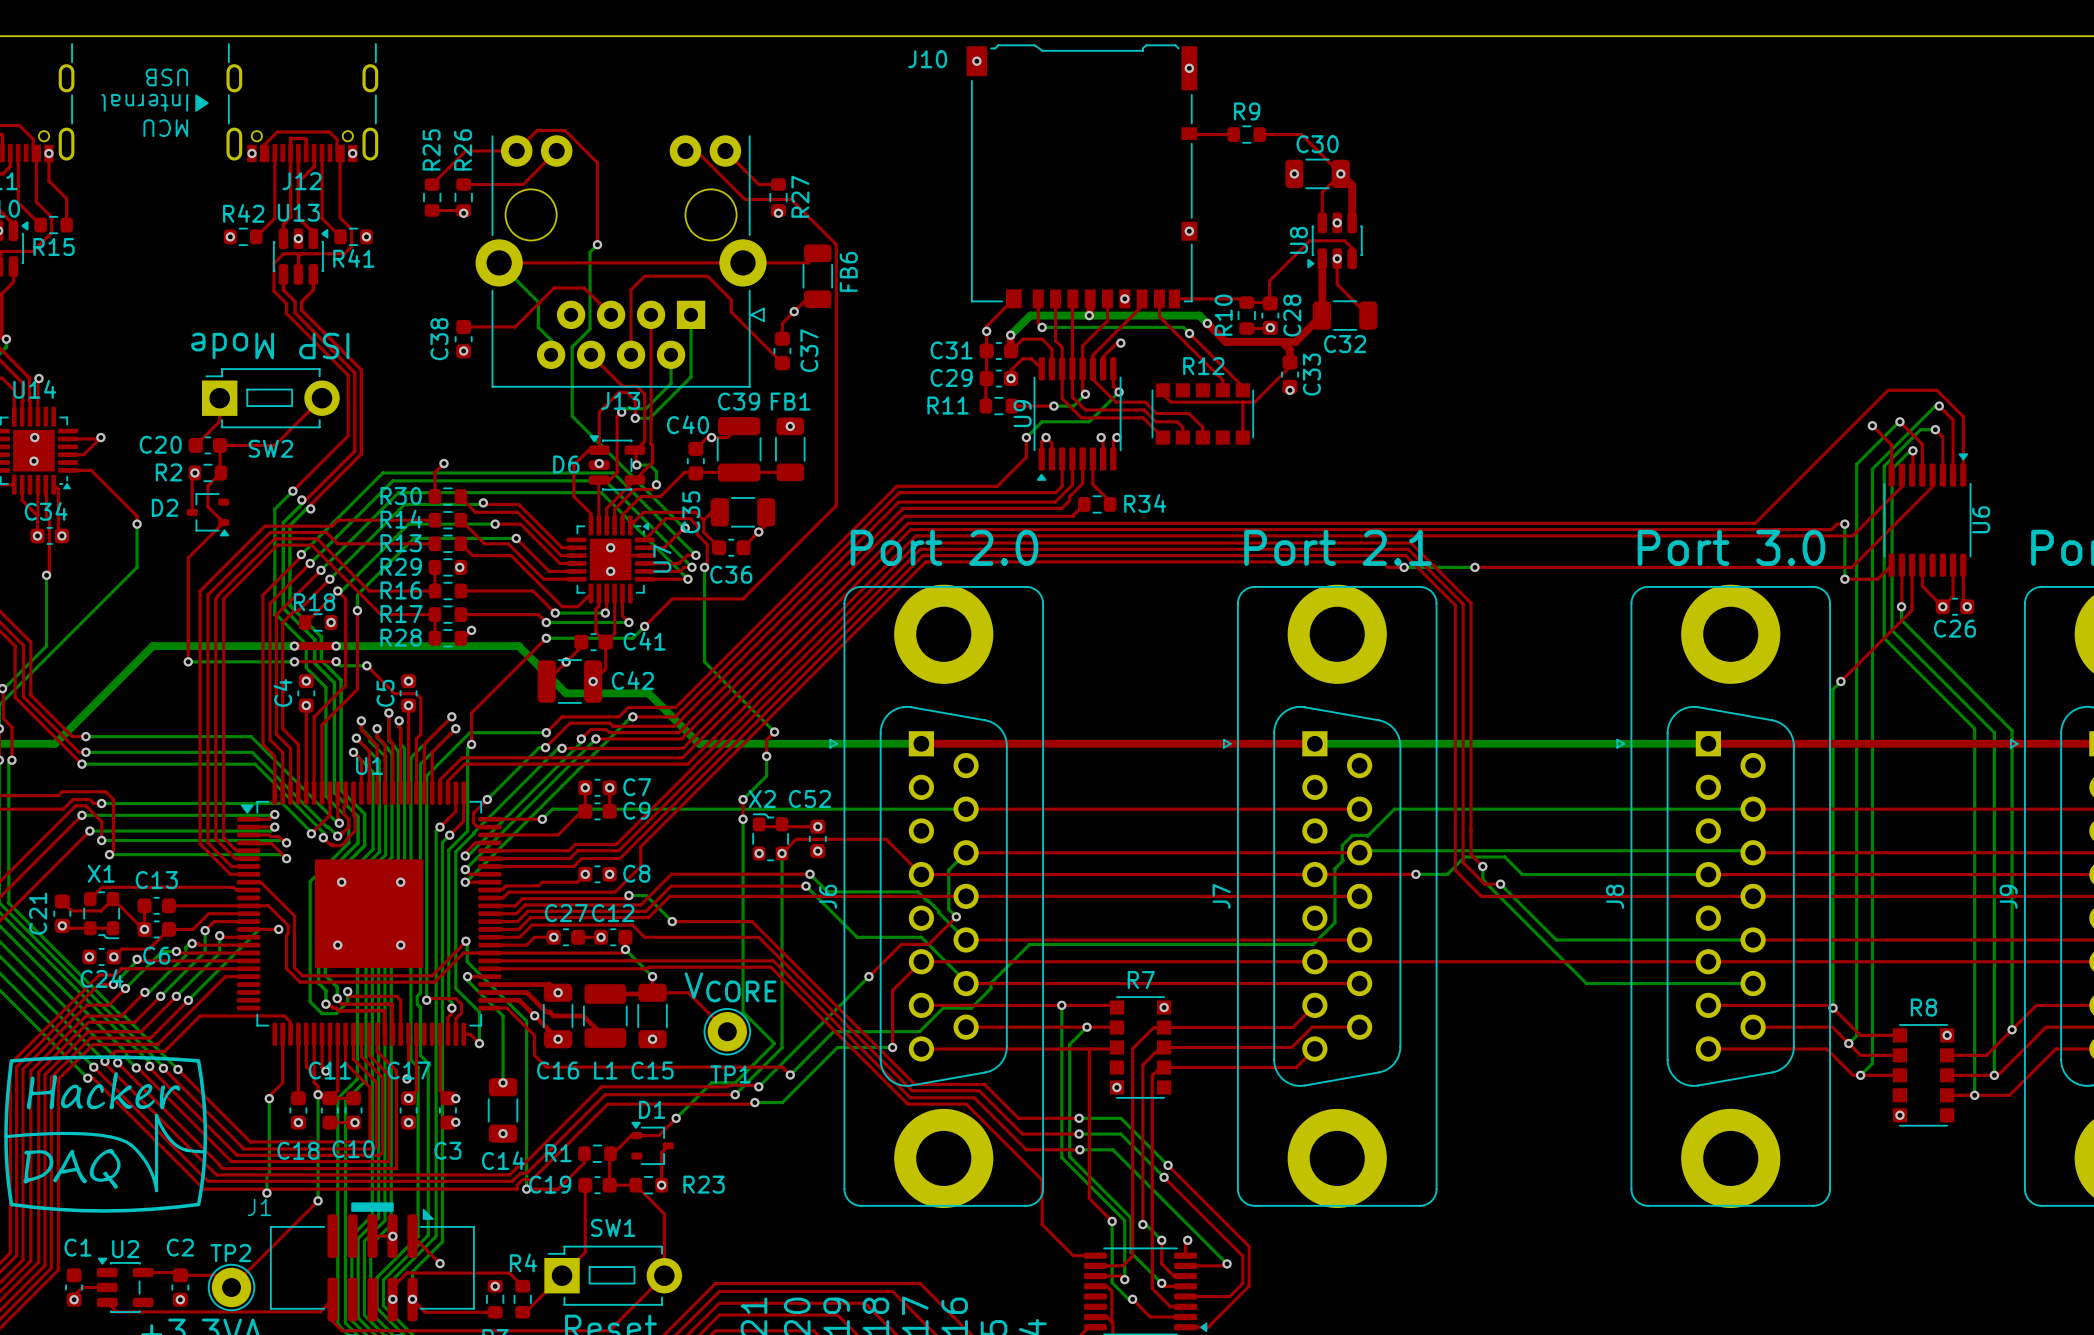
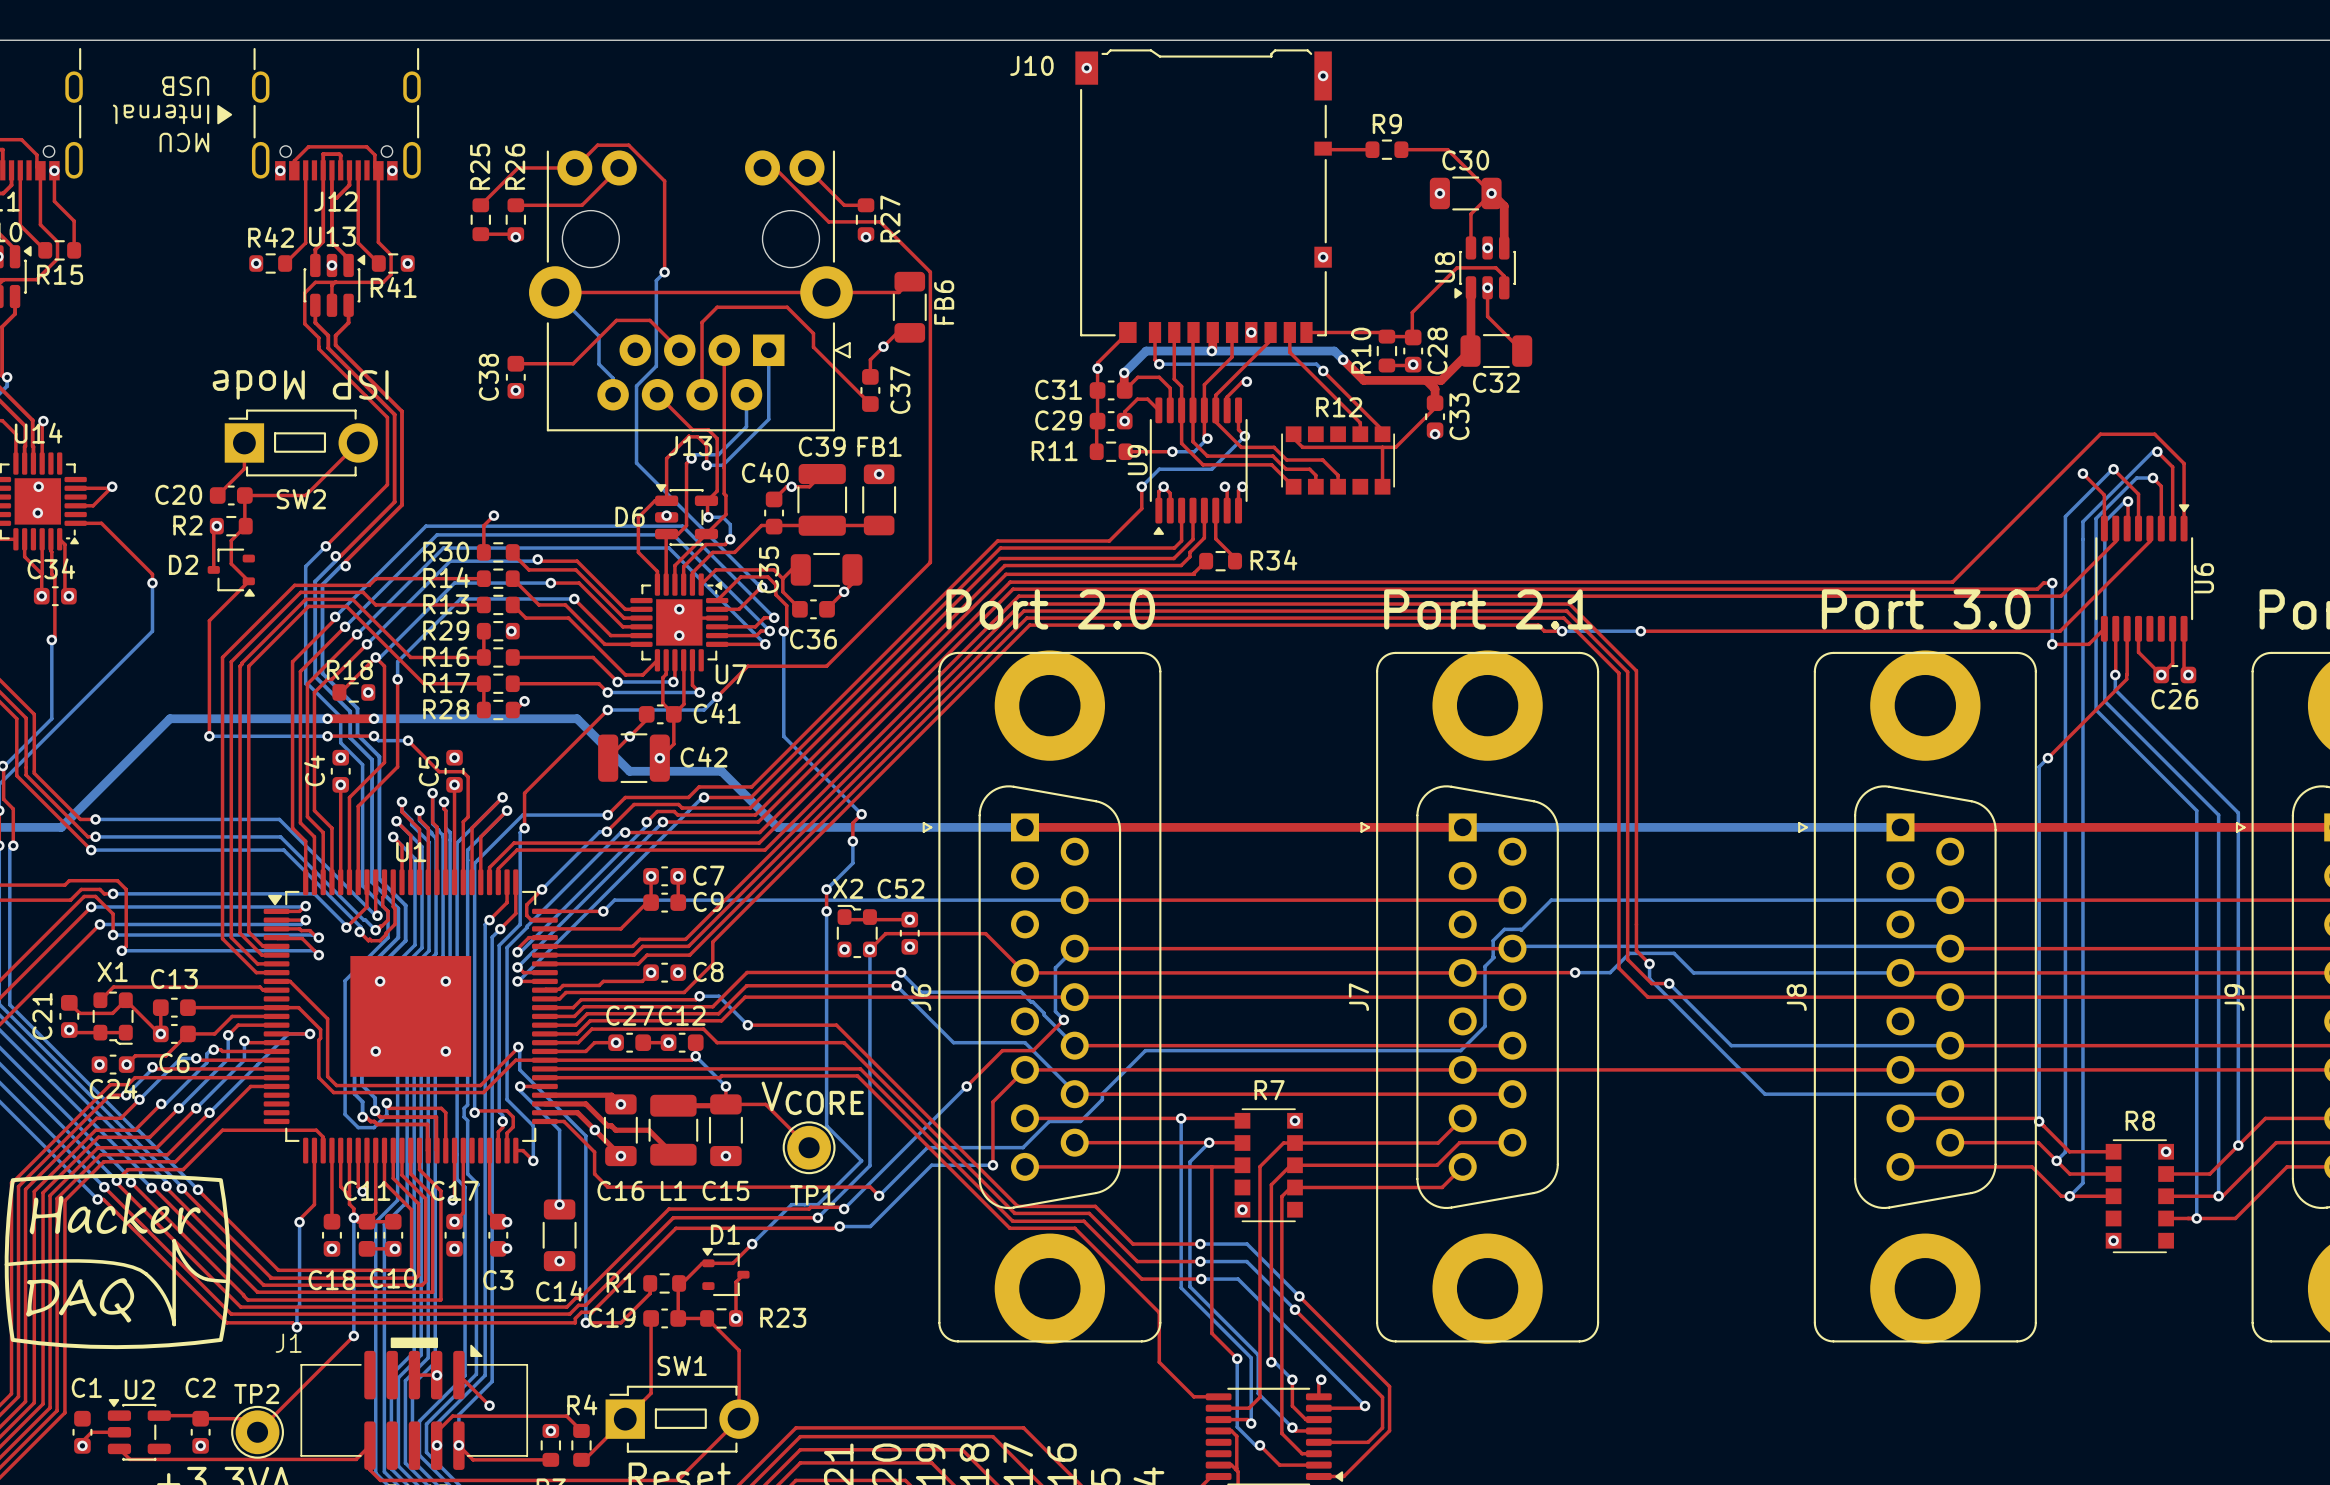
U7 name rotation: 0° (662, 558) -> 90° clockwise (731, 674)
U7 name position: U7 (662, 558) -> U7 (731, 674)

